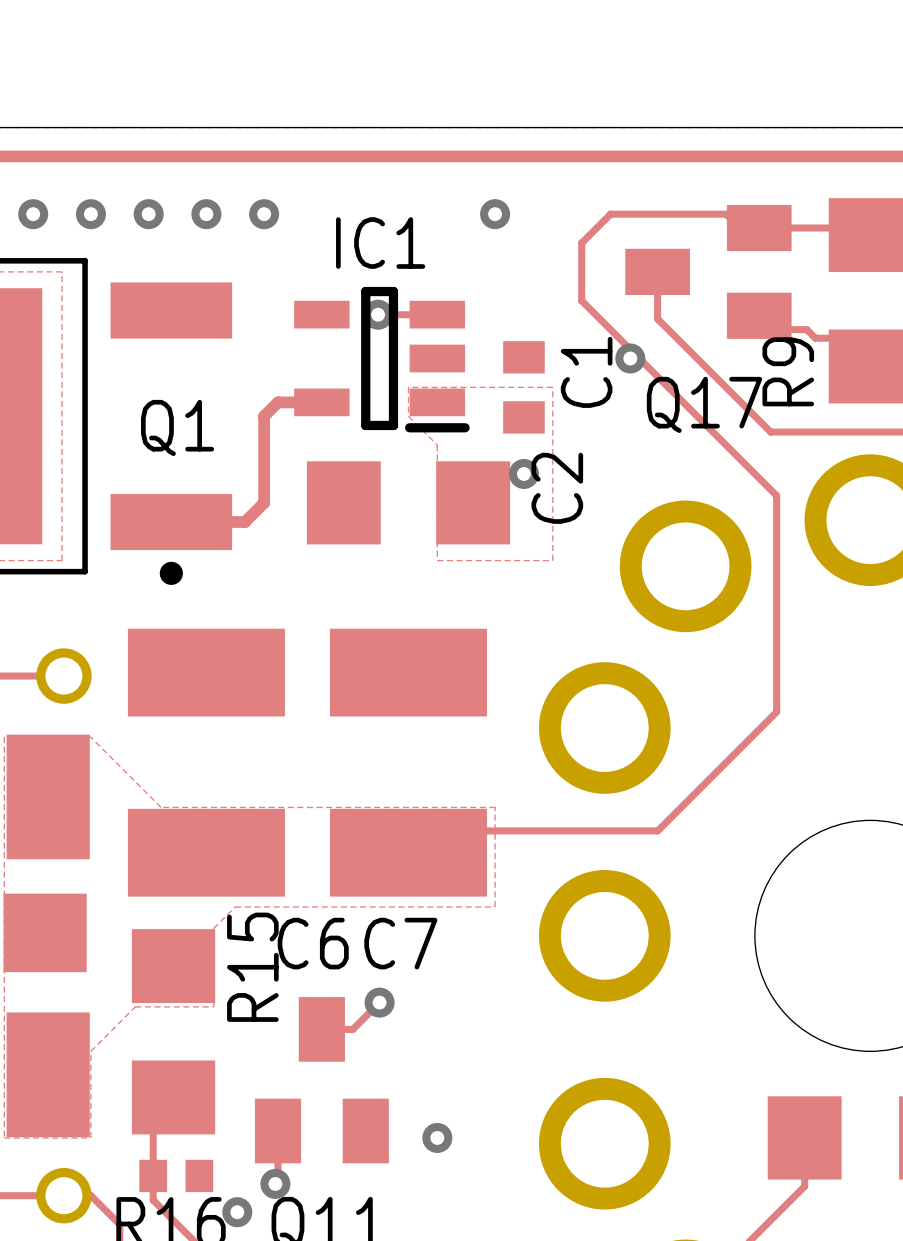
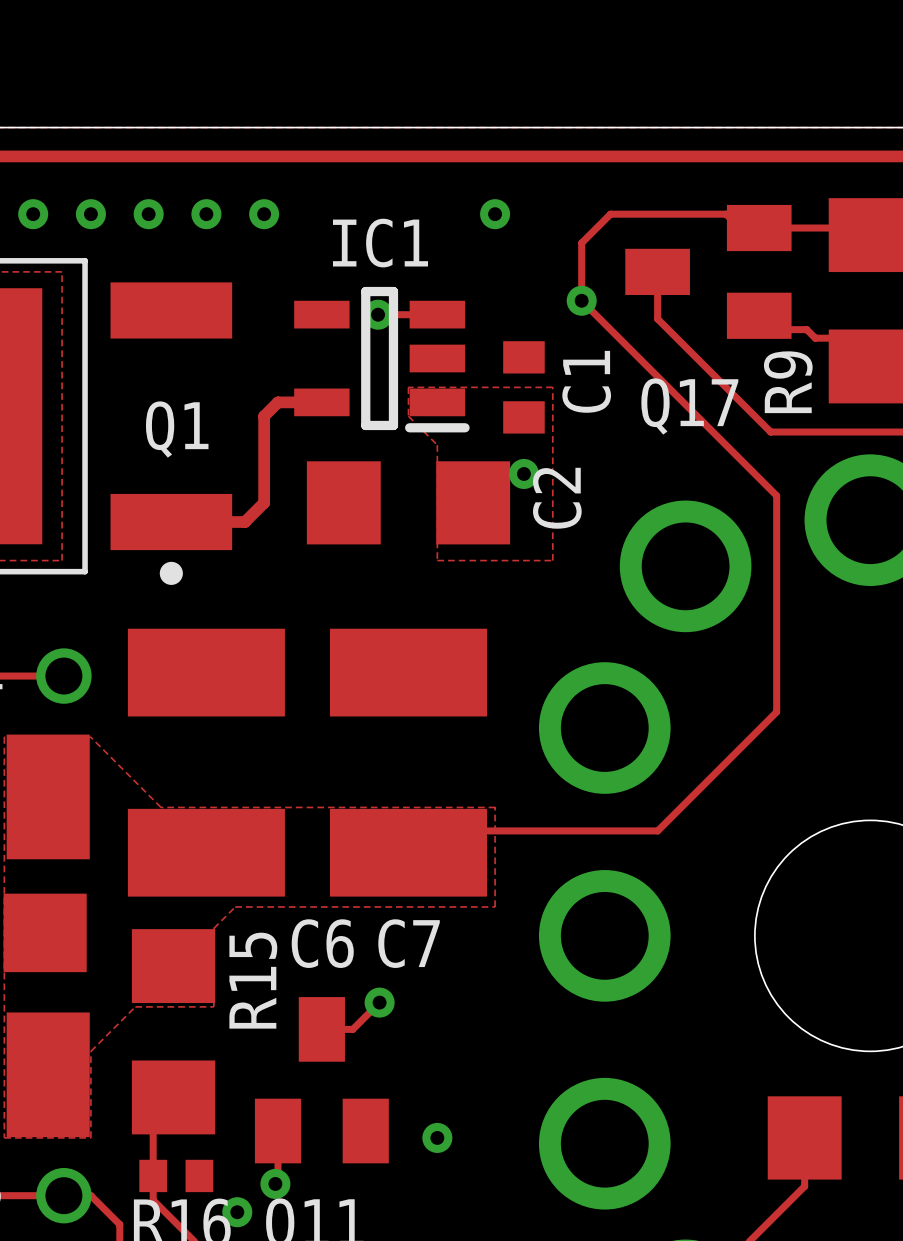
via position: (630, 358) -> (581, 300)

